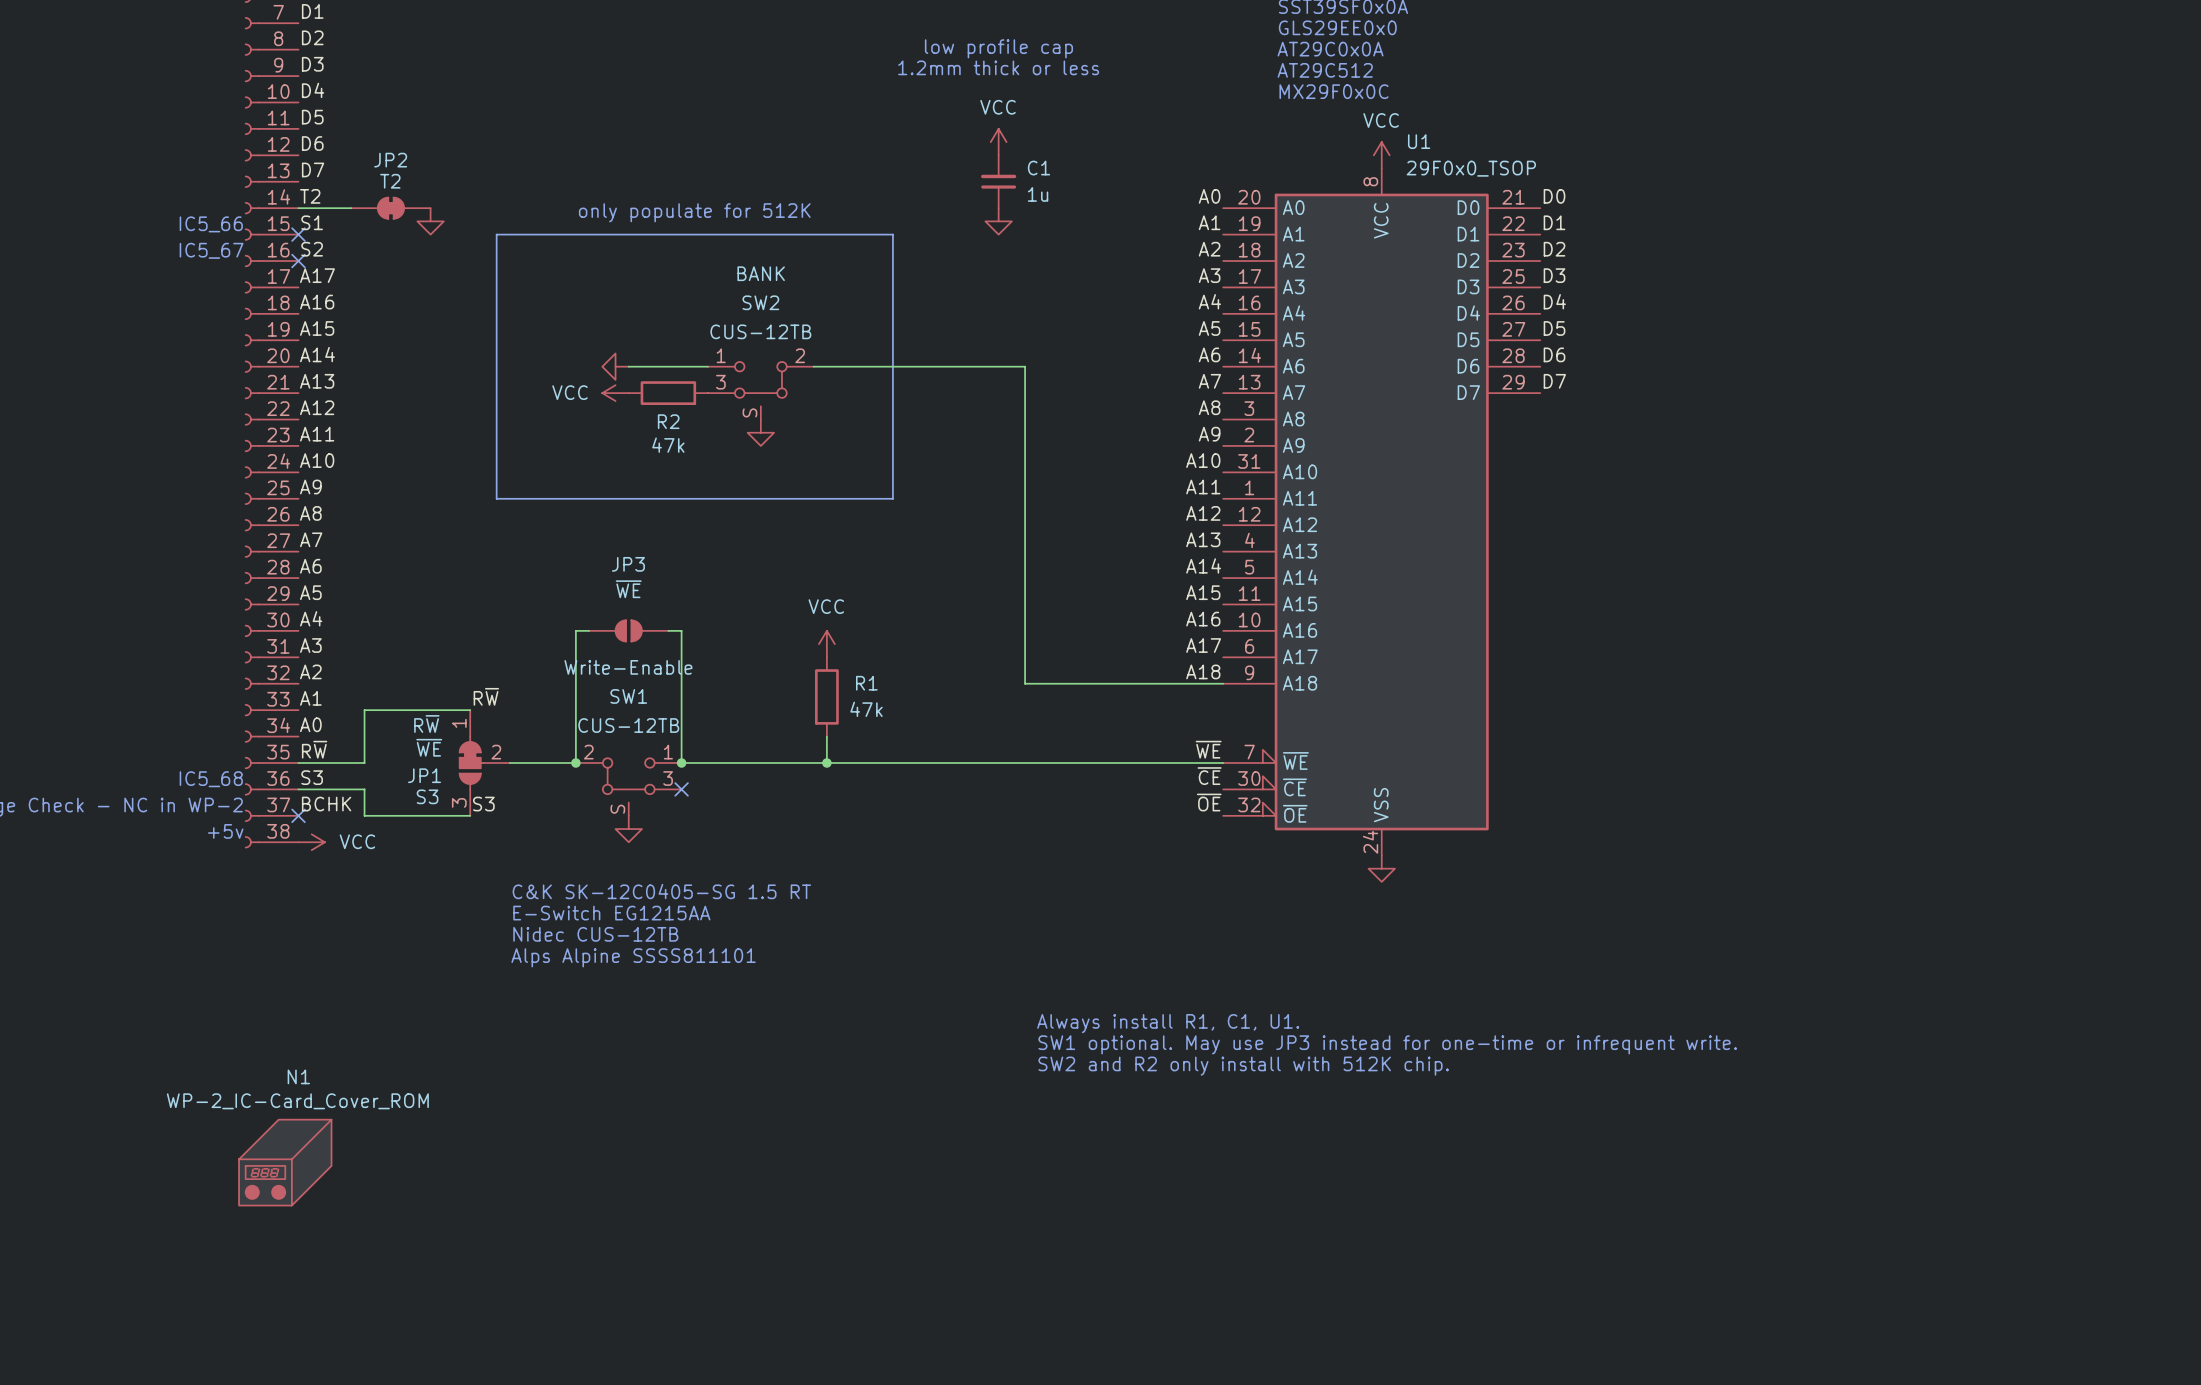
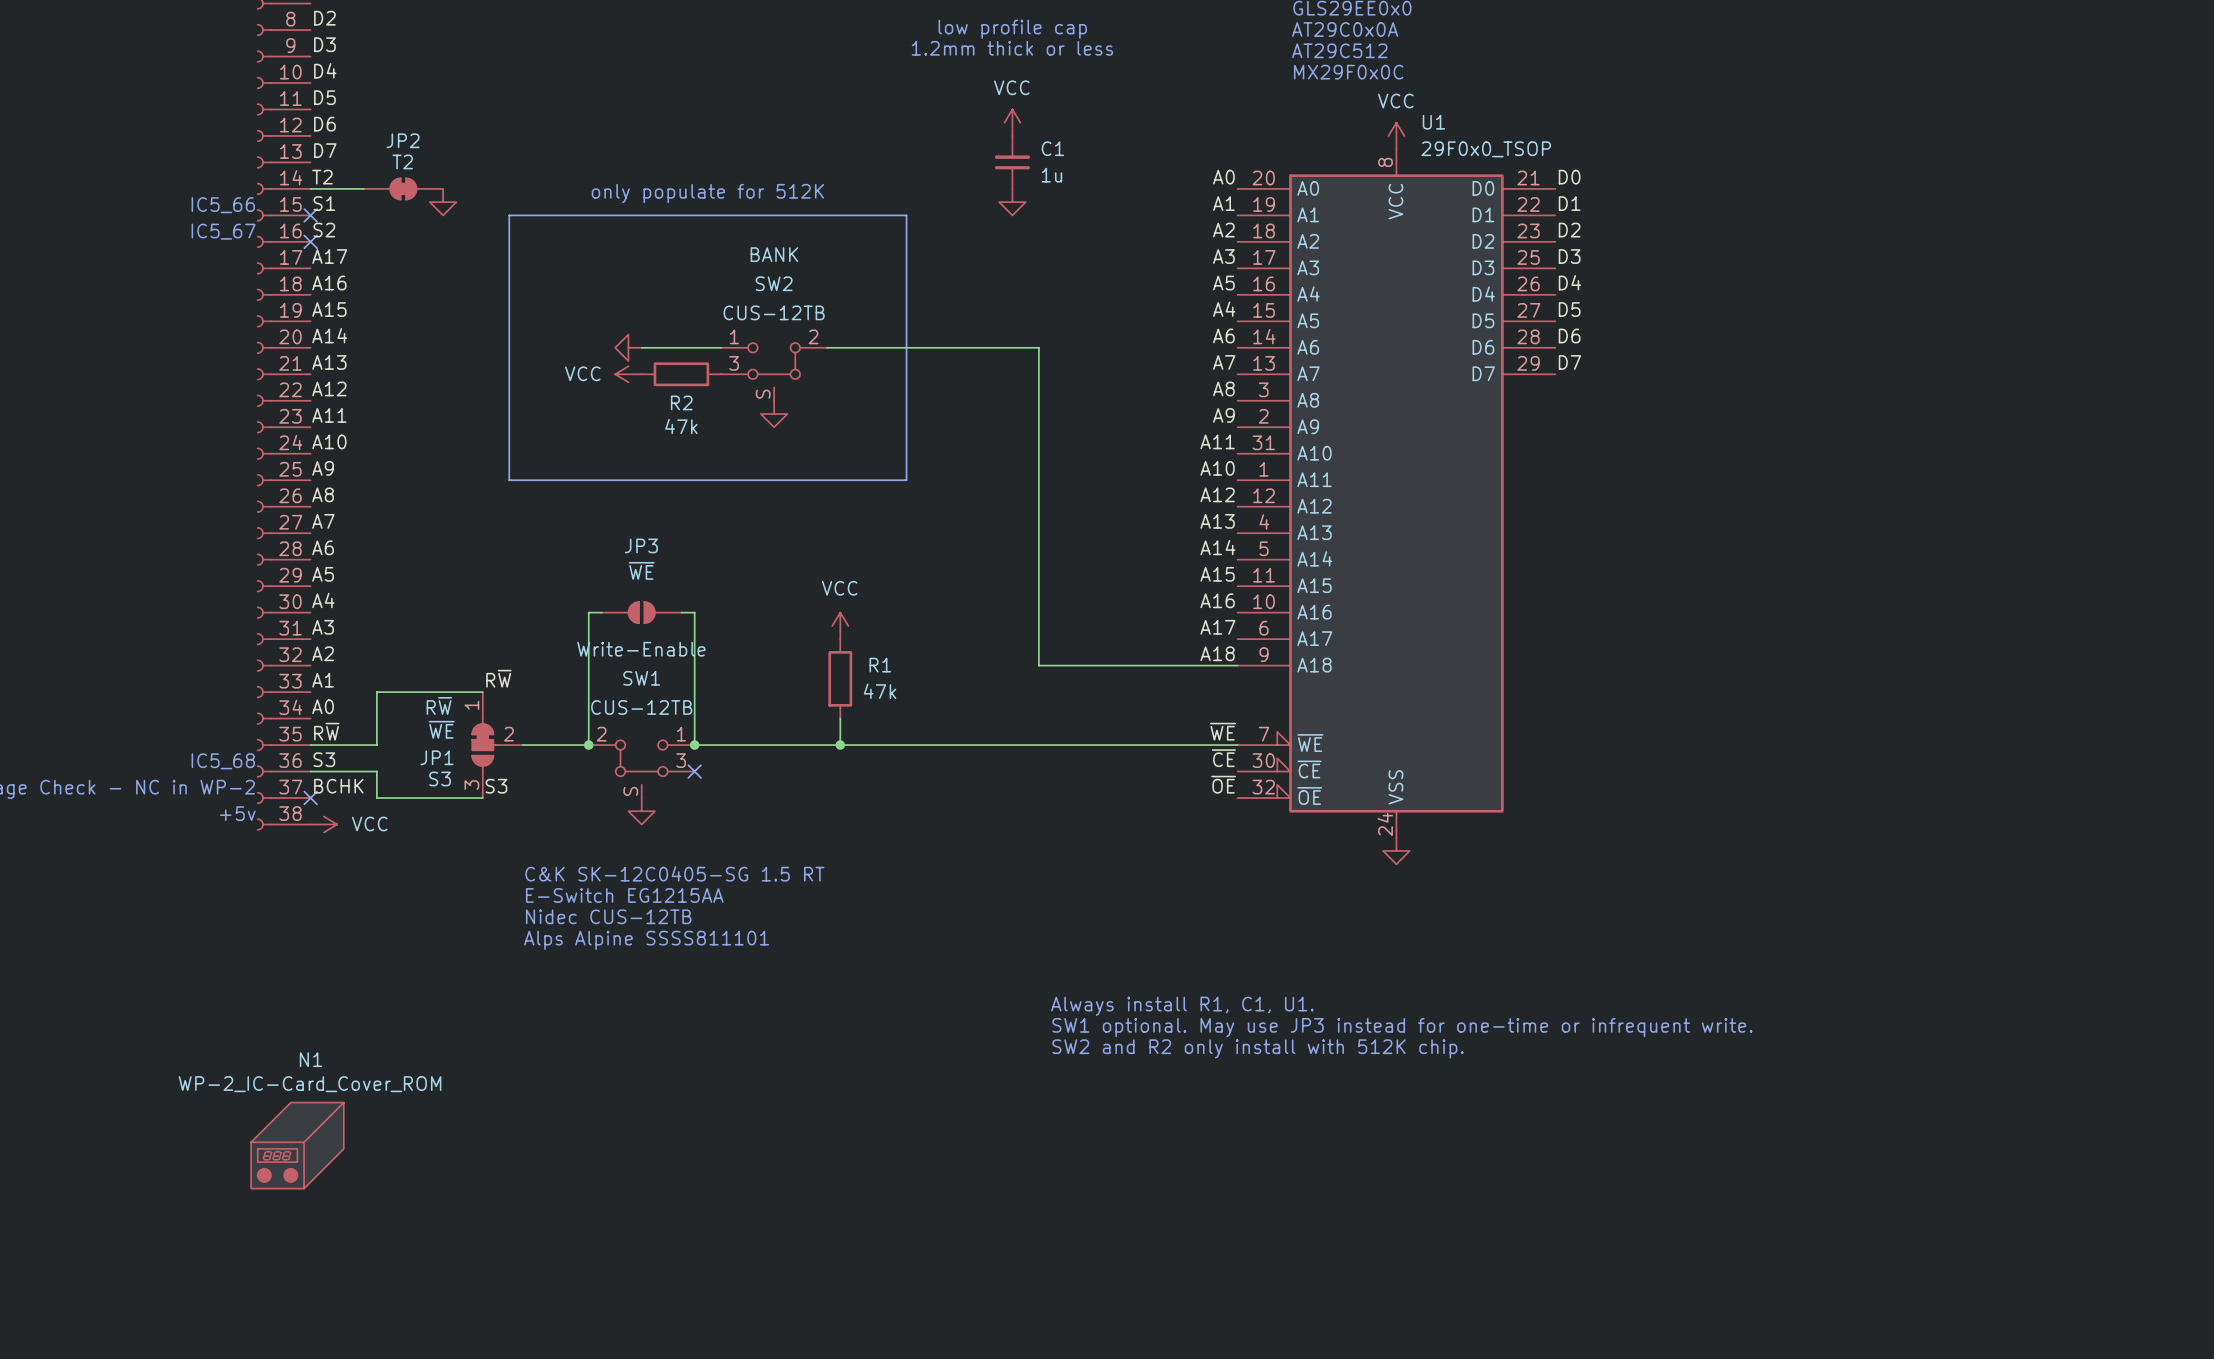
label: A4 (1209, 301) -> A5 (1223, 283)
label: A5 (1209, 328) -> A4 (1224, 309)
label: A10 (1203, 460) -> A11 (1217, 441)
label: A11 (1203, 487) -> A10 (1217, 468)

